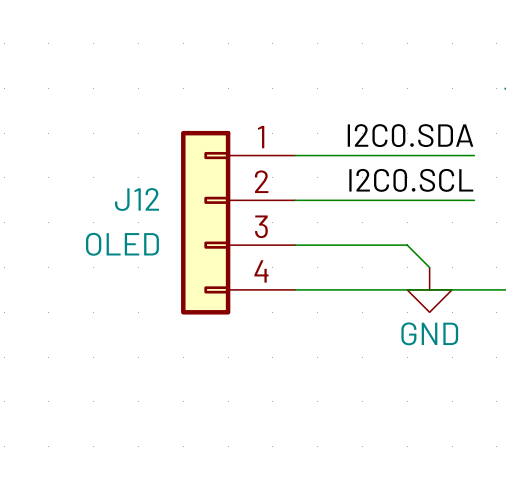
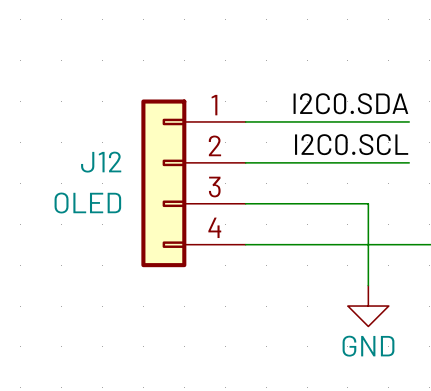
wire: (407, 245) (429, 267) -> (347, 203) (368, 203) (368, 285)
power symbol position: GND (429, 289) -> GND (368, 306)

